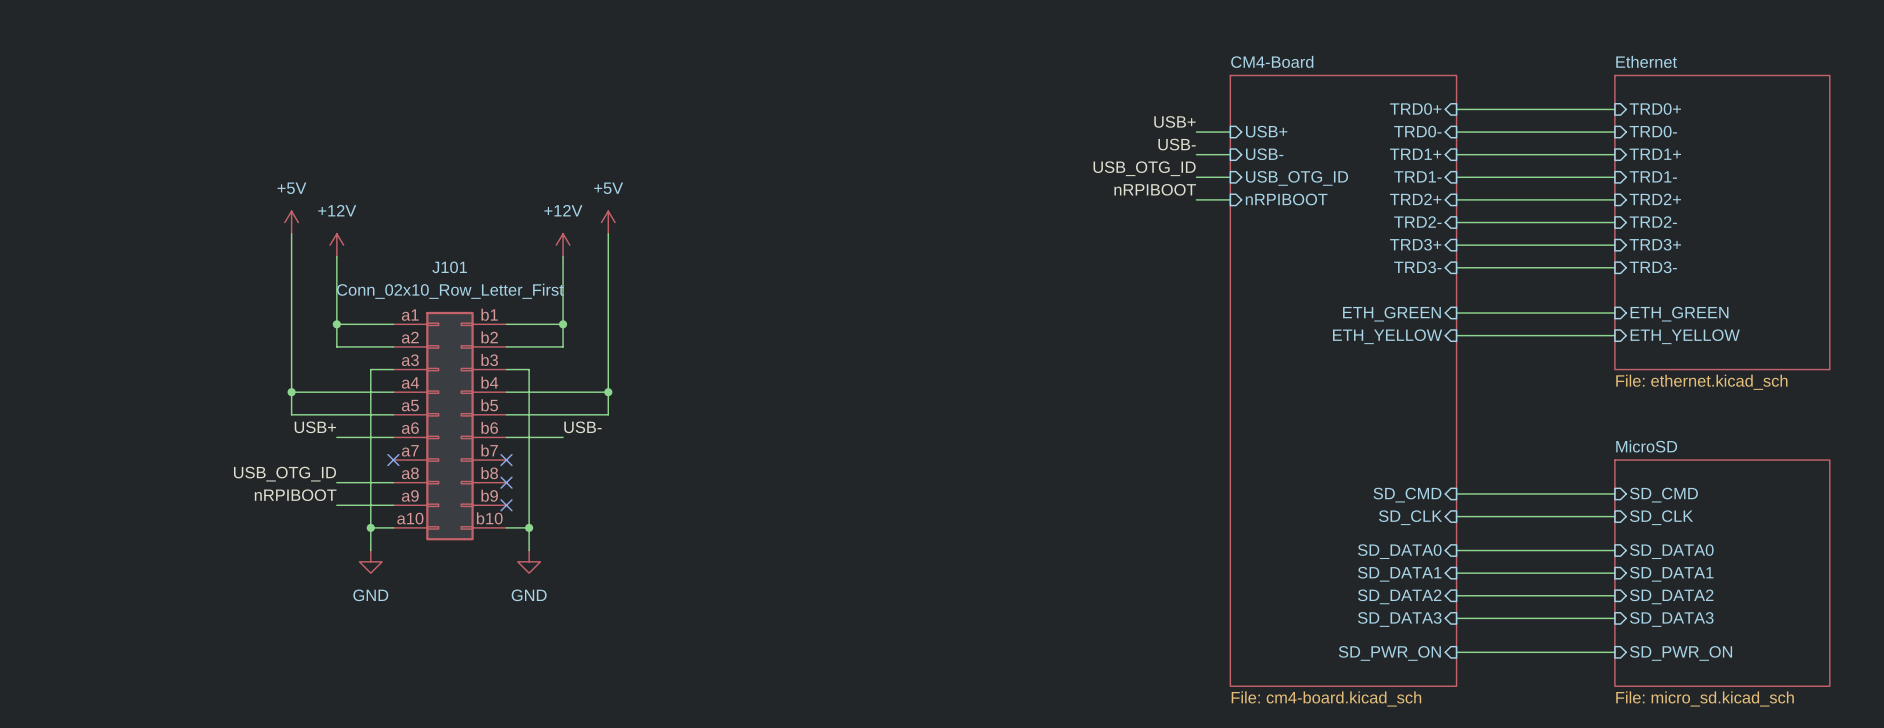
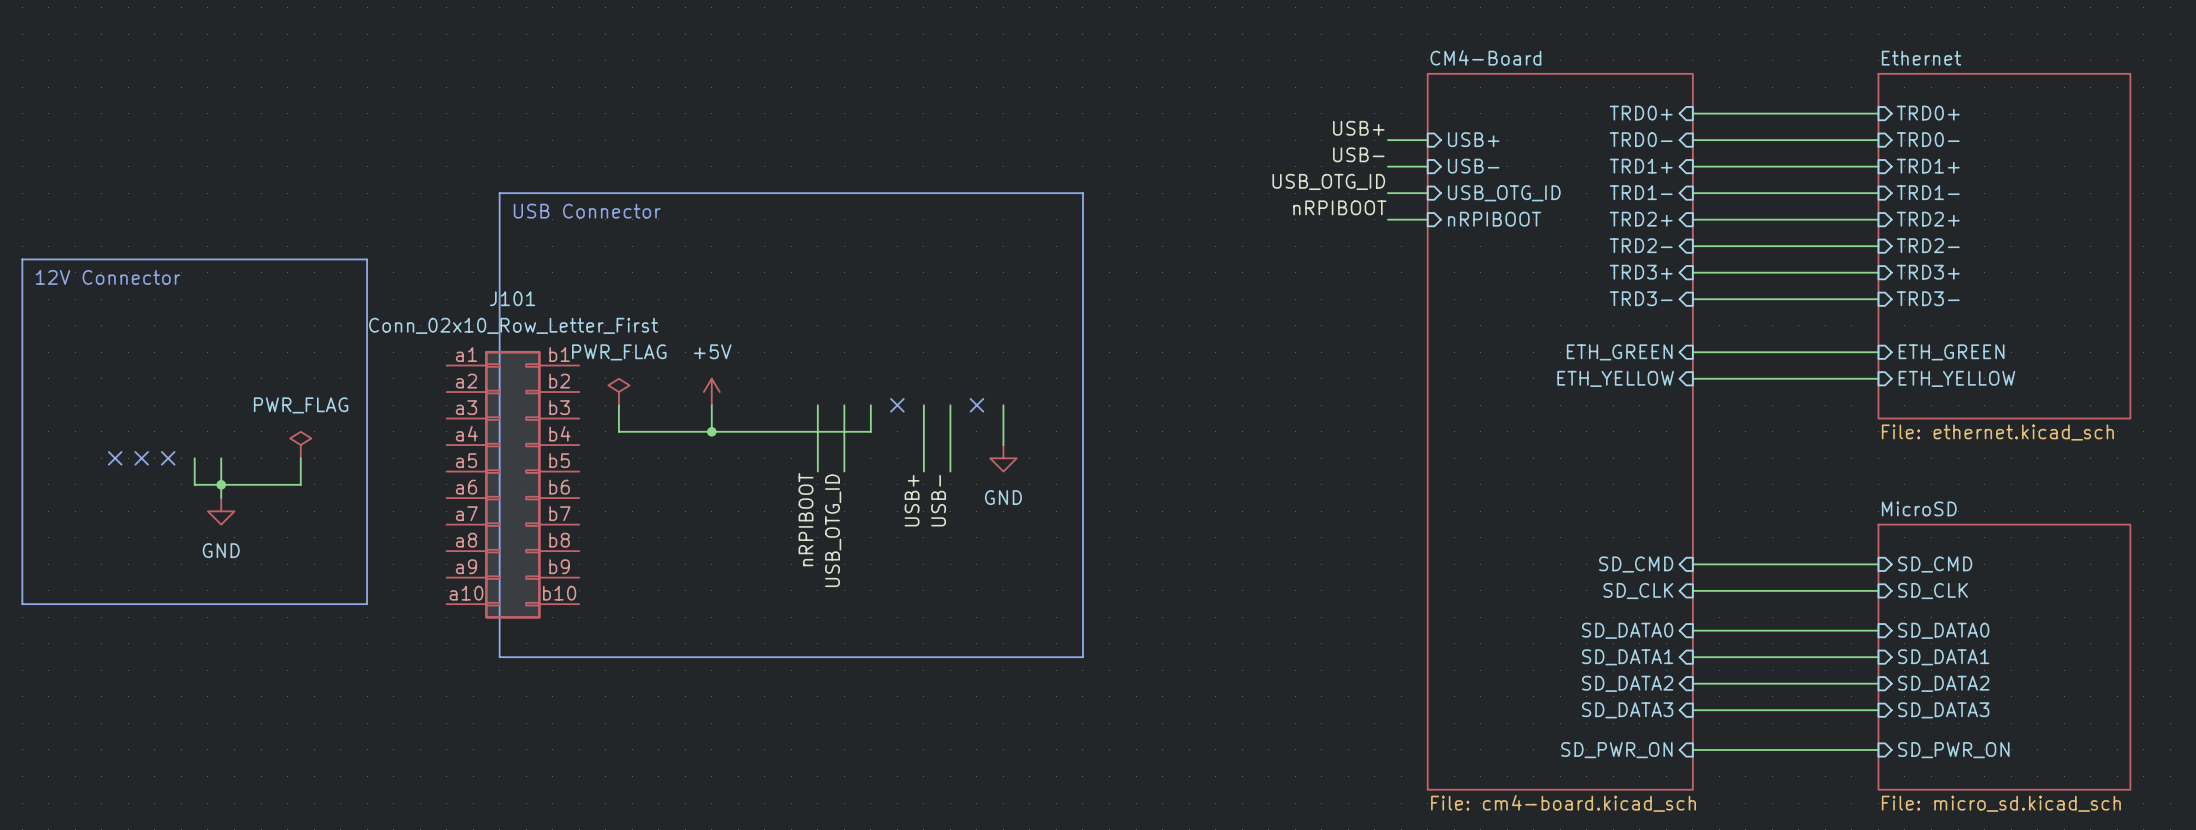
line: none -> (499, 193) (1082, 193) (1082, 657) (499, 657) (499, 193)
text: none -> USB Connector (587, 211)
power symbol: +5V (291, 222) -> none
power symbol position: +5V (608, 222) -> +5V (711, 392)
line: none -> (22, 259) (367, 259) (367, 604) (22, 604) (22, 259)
wire: (291, 233) (291, 414) (393, 414) -> none
wire: (608, 233) (608, 414) (506, 414) -> none
power symbol: +12V (336, 245) -> none
power symbol: +12V (563, 245) -> none
text: none -> 12V Connector (108, 277)
wire: (336, 256) (336, 346) (393, 346) -> none
wire: (563, 256) (563, 346) (506, 346) -> none
wire: (336, 324) (393, 324) -> none
junction: (336, 324) -> none
wire: (506, 324) (563, 324) -> none
junction: (563, 324) -> none
power symbol: none -> PWR_FLAG (618, 392)
wire: none -> (618, 405) (618, 431) (870, 431) (870, 405)
wire: none -> (711, 405) (711, 431)
wire: none -> (817, 405) (817, 471)
wire: none -> (844, 405) (844, 471)
no-connect mark: none -> (897, 405)
wire: none -> (923, 405) (923, 471)
wire: none -> (950, 405) (950, 471)
no-connect mark: none -> (976, 405)
wire: none -> (1003, 405) (1003, 445)
wire: (393, 369) (370, 369) (370, 550) -> none
wire: (506, 369) (529, 369) (529, 550) -> none
power symbol: none -> PWR_FLAG (300, 445)
wire: (291, 392) (393, 392) -> none
junction: (291, 392) -> none
wire: (506, 392) (608, 392) -> none
junction position: (608, 392) -> (711, 431)
no-connect mark: none -> (115, 458)
no-connect mark: none -> (141, 458)
no-connect mark: none -> (168, 458)
wire: none -> (194, 458) (194, 484) (300, 484) (300, 458)
wire: none -> (221, 458) (221, 498)
power symbol: none -> GND (1003, 458)
junction: none -> (221, 484)
label: USB+ (315, 427) -> none
label: USB- (582, 427) -> none
label: none -> USB- (938, 500)
label: none -> USB+ (912, 500)
wire: (336, 437) (393, 437) -> none
wire: (506, 437) (563, 437) -> none
power symbol: none -> GND (221, 511)
label: none -> nRPIBOOT (806, 519)
no-connect mark: (393, 460) -> none
no-connect mark: (506, 460) -> none
label: none -> USB_OTG_ID (833, 530)
label: USB_OTG_ID (285, 474) -> none
wire: (336, 482) (393, 482) -> none
no-connect mark: (506, 482) -> none
label: nRPIBOOT (295, 495) -> none
wire: (336, 505) (393, 505) -> none
no-connect mark: (506, 505) -> none
wire: (370, 527) (393, 527) -> none
junction: (370, 527) -> none
wire: (506, 527) (529, 527) -> none
junction: (529, 527) -> none
power symbol: GND (370, 561) -> none
power symbol: GND (529, 561) -> none

